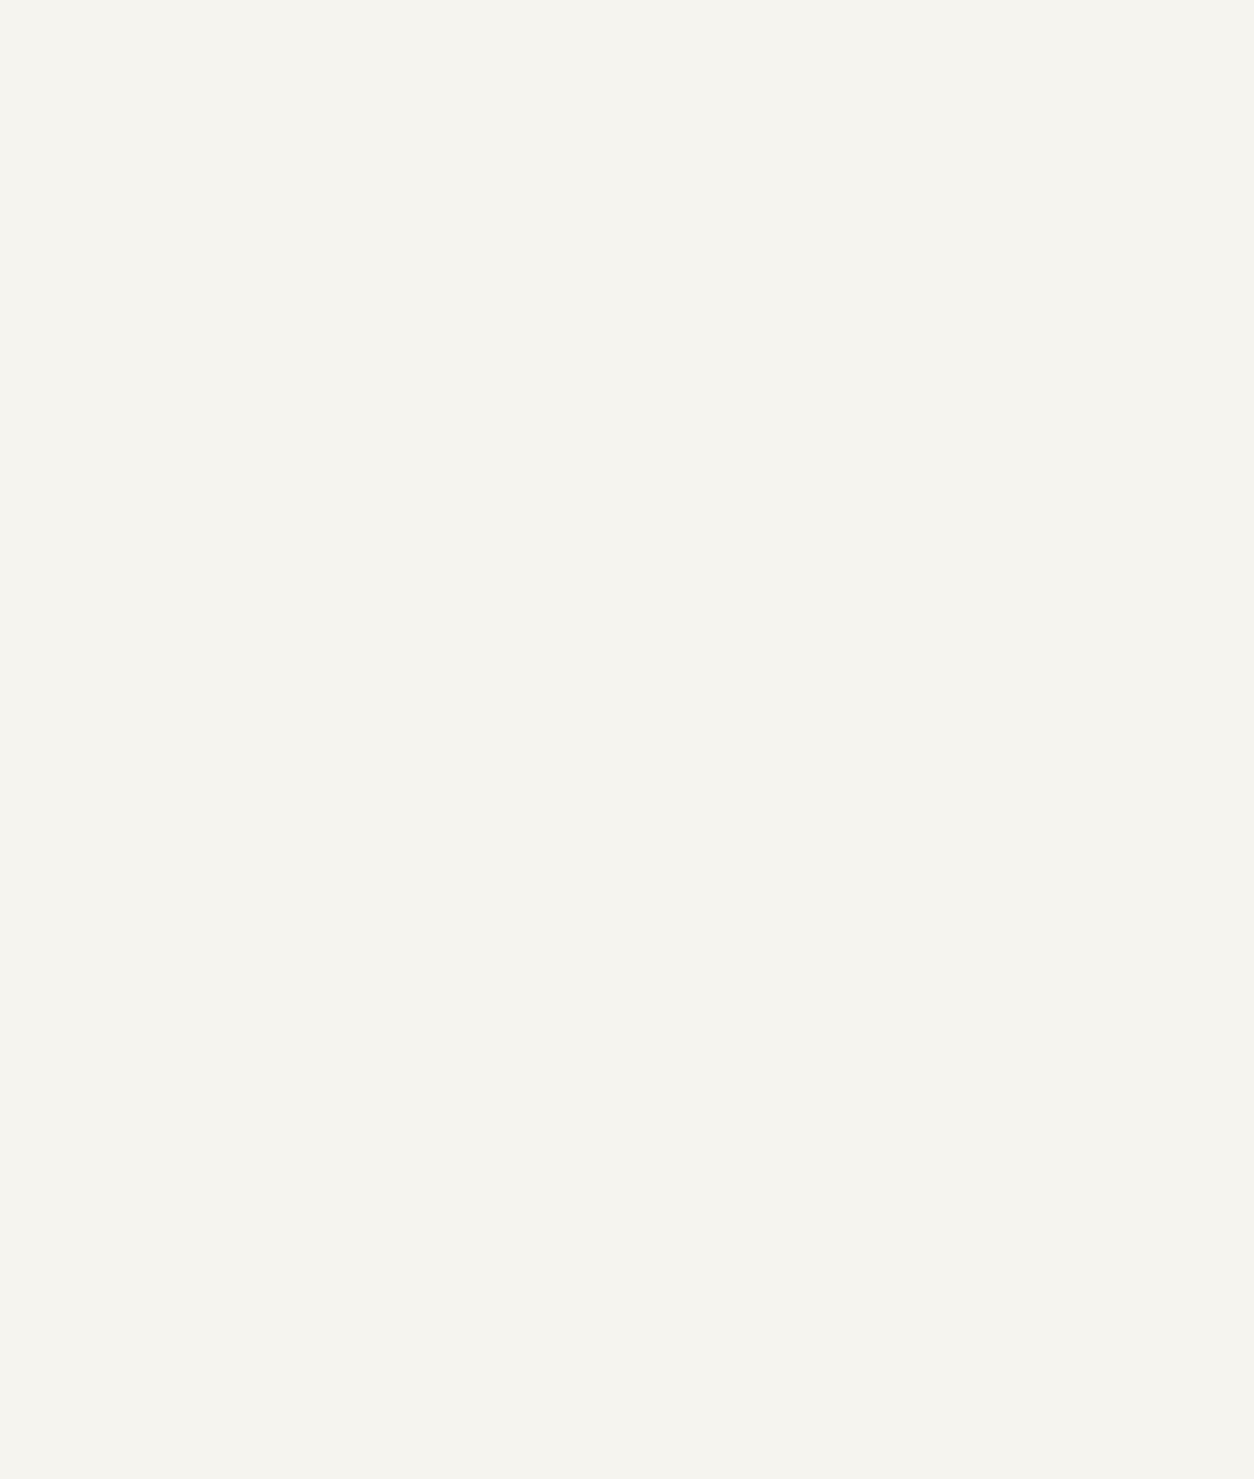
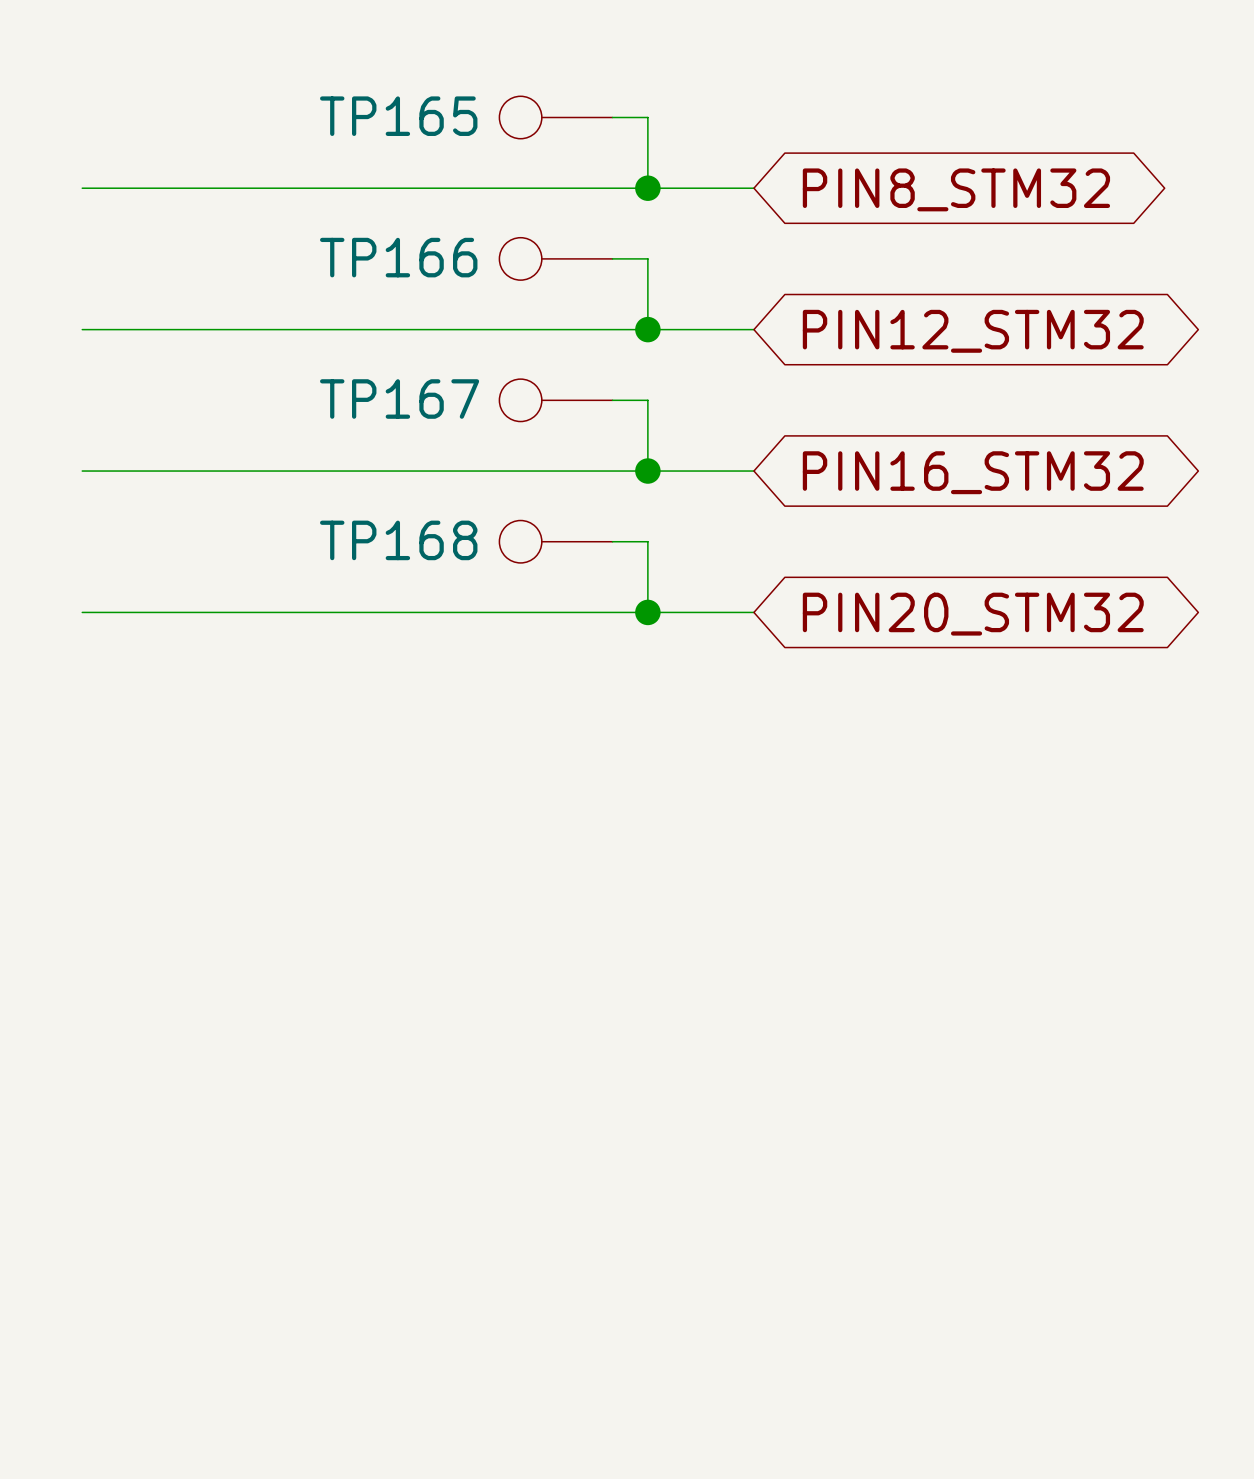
TP165: none -> (555, 117)
wire: none -> (612, 117) (647, 117) (647, 188)
wire: none -> (82, 188) (753, 188)
junction: none -> (647, 188)
global label: none -> PIN8_STM32 (956, 189)
TP166: none -> (555, 258)
wire: none -> (612, 258) (647, 258) (647, 329)
wire: none -> (82, 329) (753, 329)
junction: none -> (647, 329)
global label: none -> PIN12_STM32 (973, 331)
TP167: none -> (555, 400)
wire: none -> (612, 400) (647, 400) (647, 471)
wire: none -> (82, 471) (753, 471)
junction: none -> (647, 471)
global label: none -> PIN16_STM32 (973, 472)
TP168: none -> (555, 541)
wire: none -> (612, 541) (647, 541) (647, 612)
wire: none -> (82, 612) (753, 612)
junction: none -> (647, 612)
global label: none -> PIN20_STM32 (973, 614)

